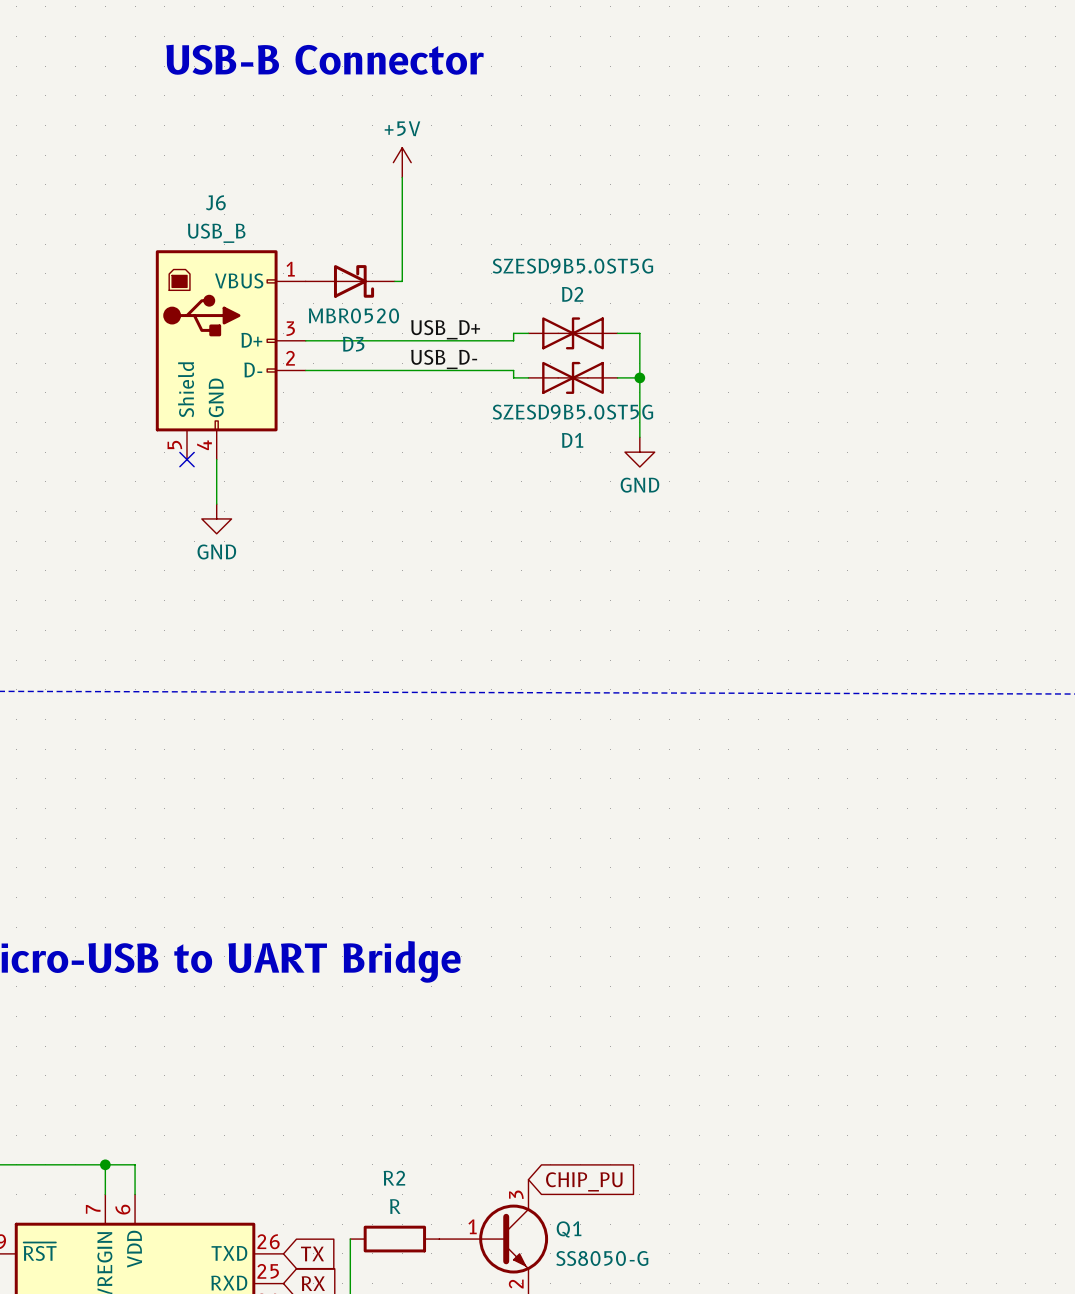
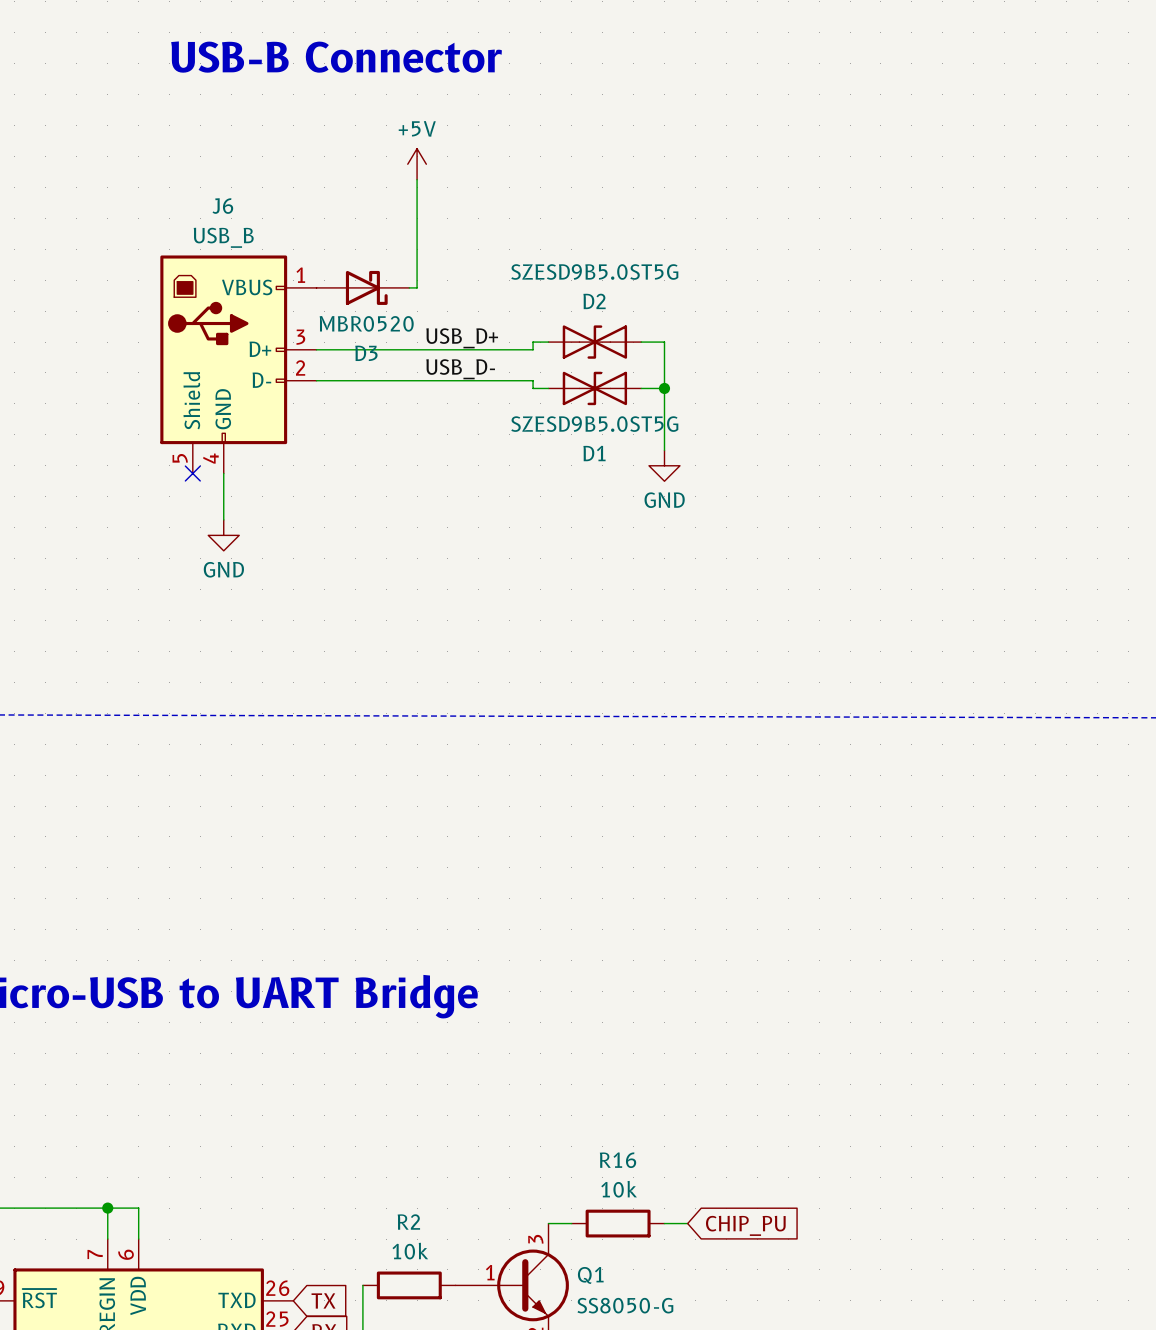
wire: none -> (548, 1223) (571, 1223)
R16: none -> 10k (618, 1223)
wire: none -> (664, 1223) (687, 1223)
global label position: CHIP_PU (584, 1181) -> CHIP_PU (745, 1225)
R2 value: R (395, 1206) -> 10k (410, 1251)

